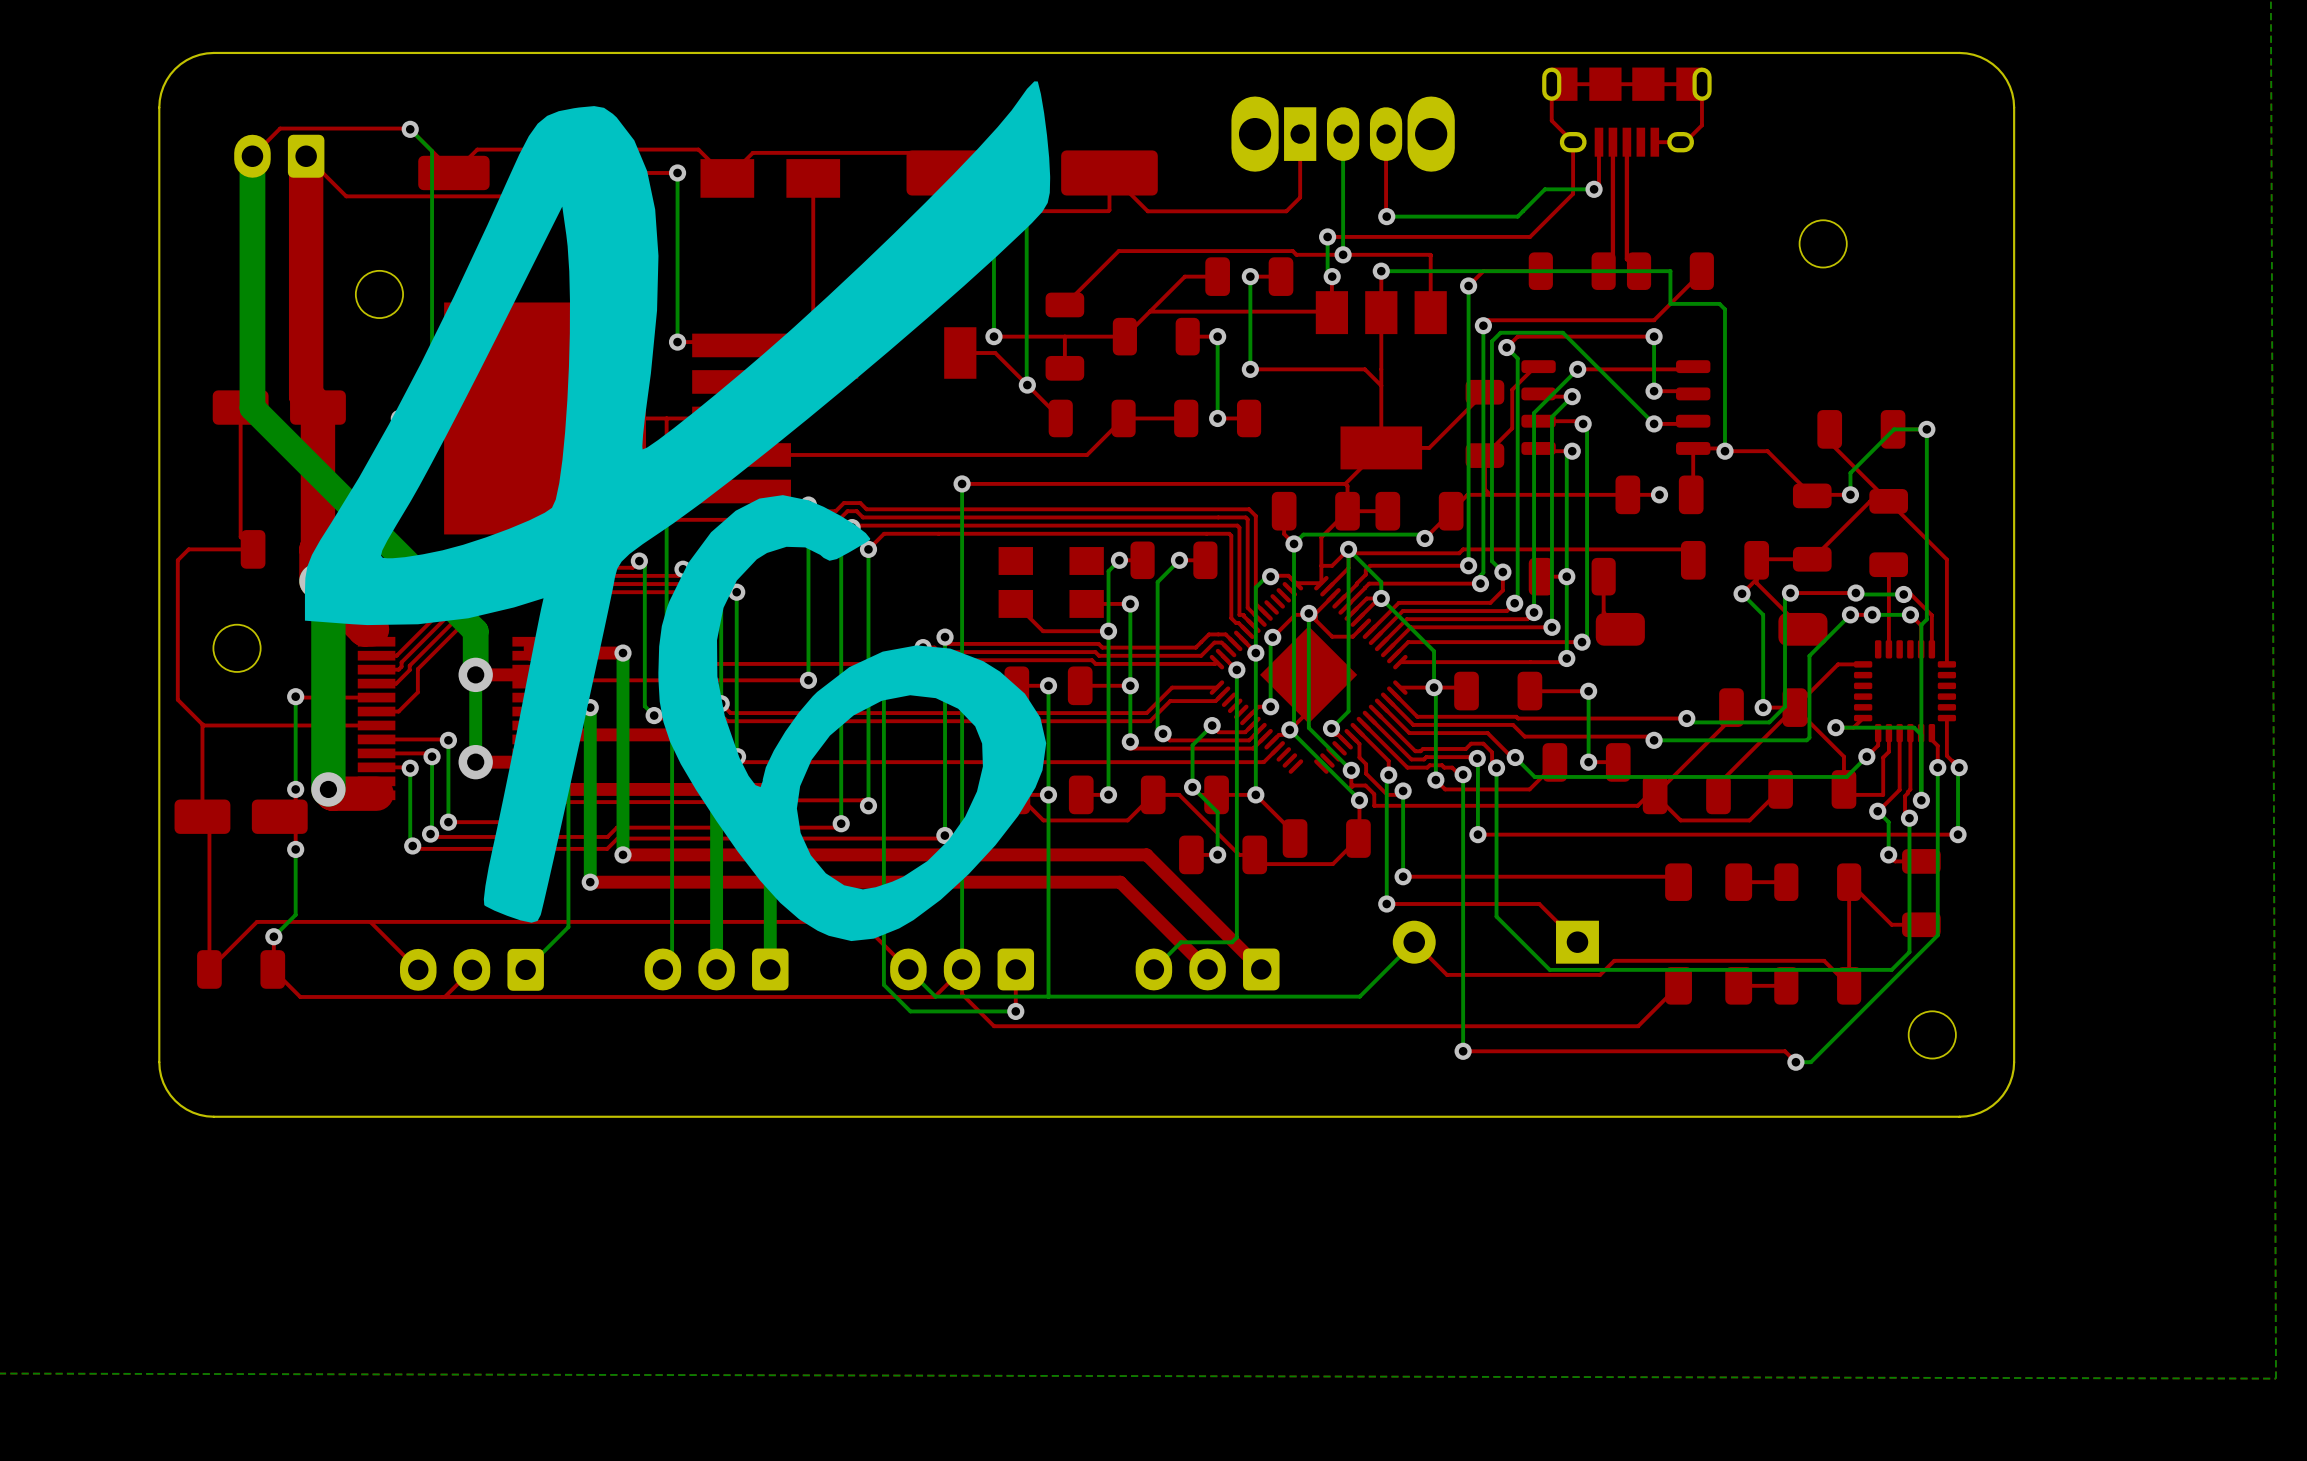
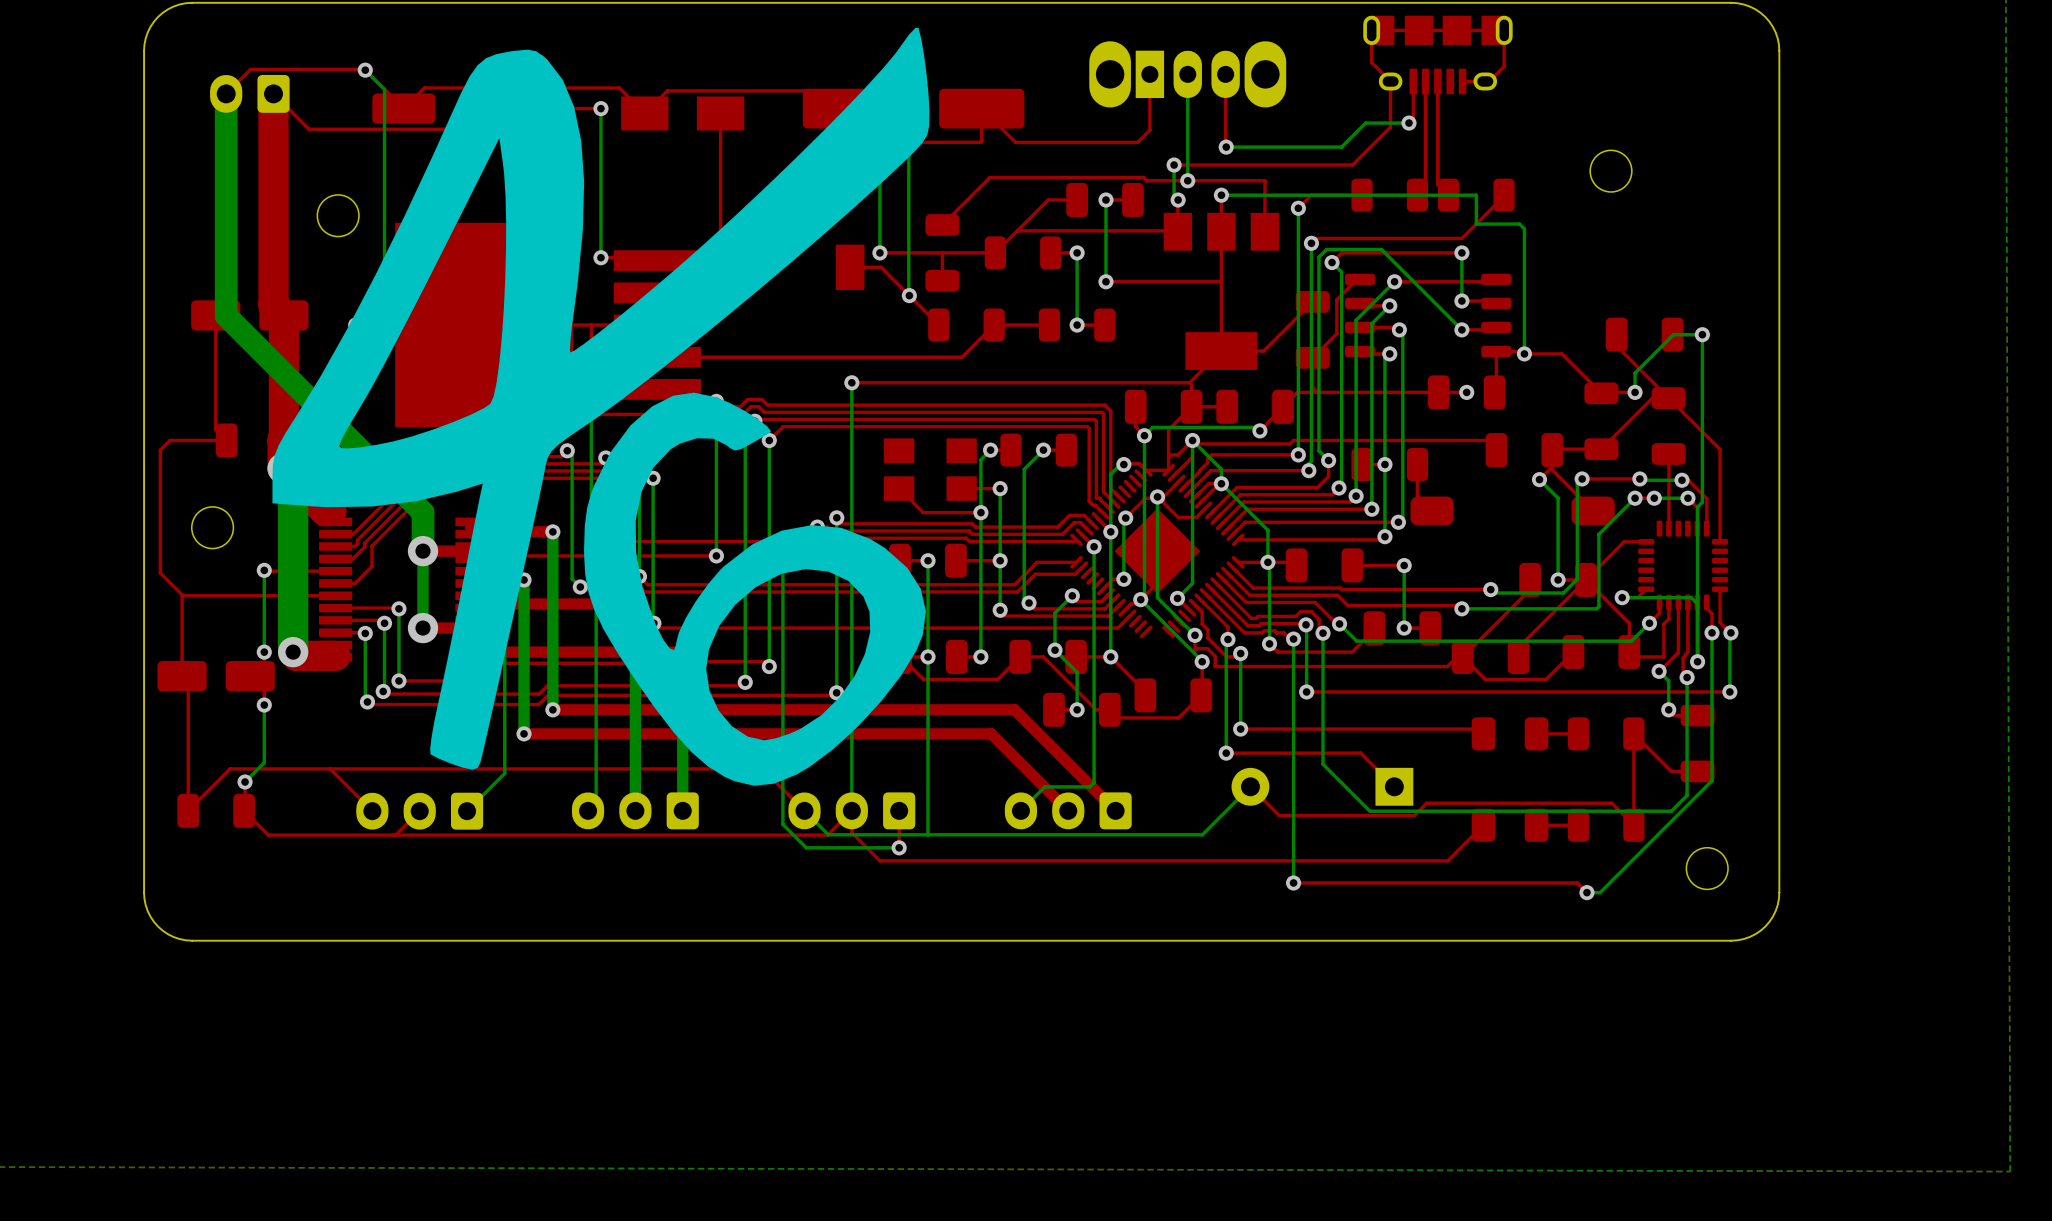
top track: (1364, 369) (1381, 385) -> (1206, 281) (1221, 281)

